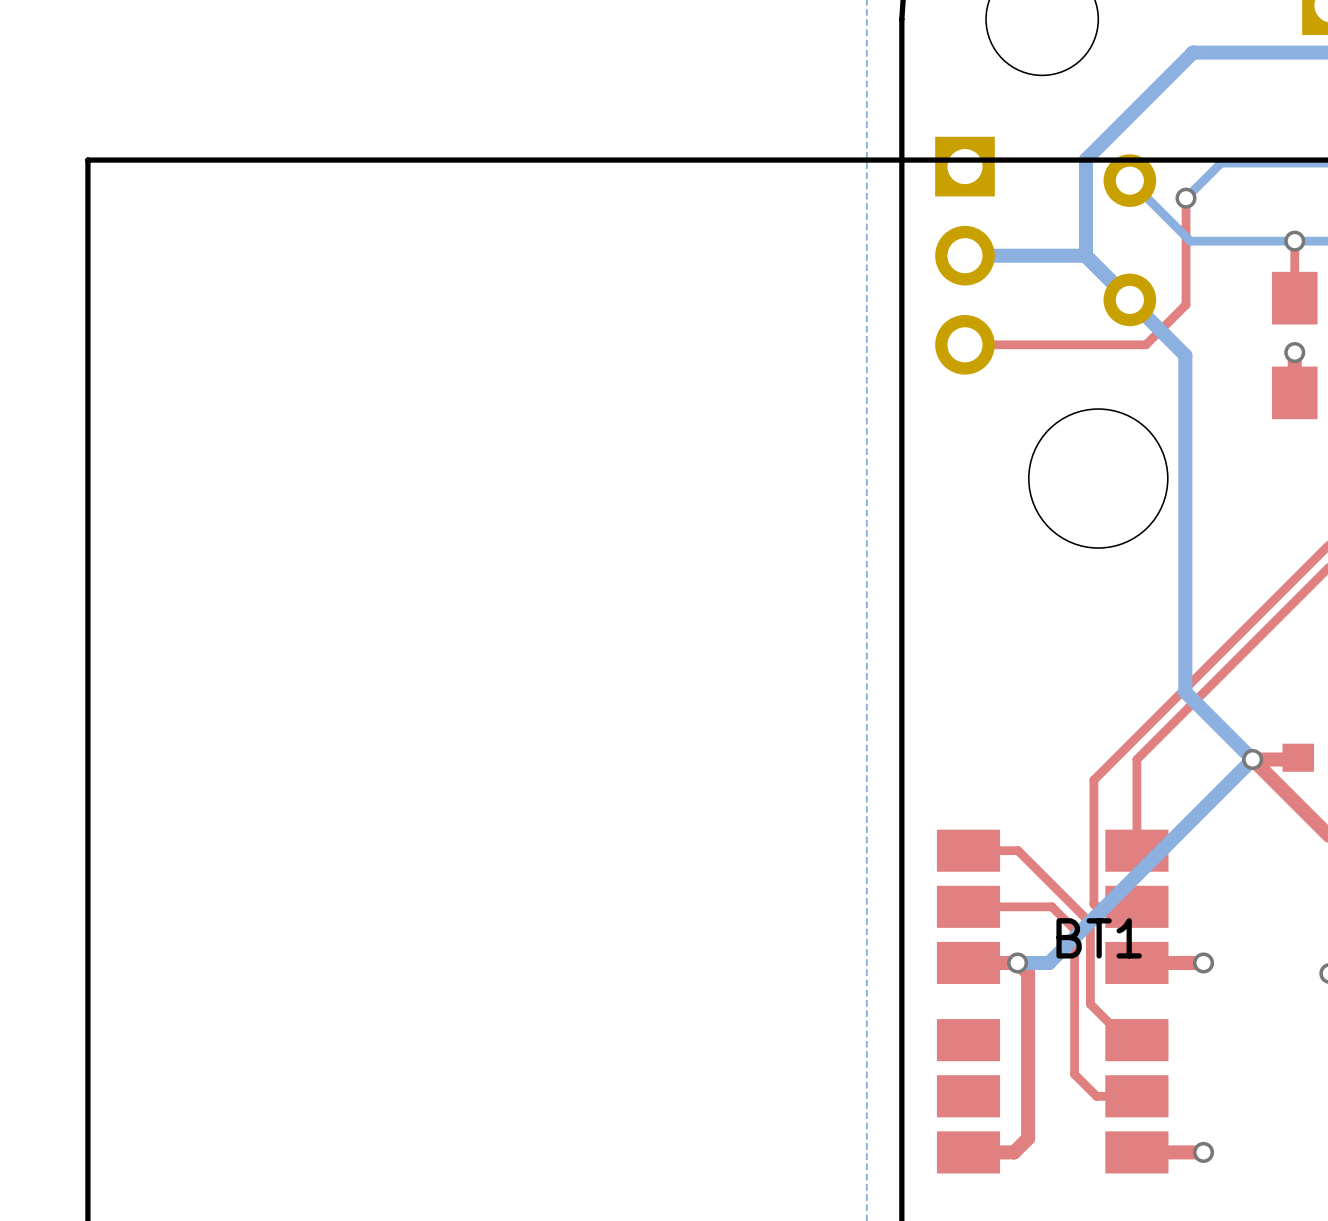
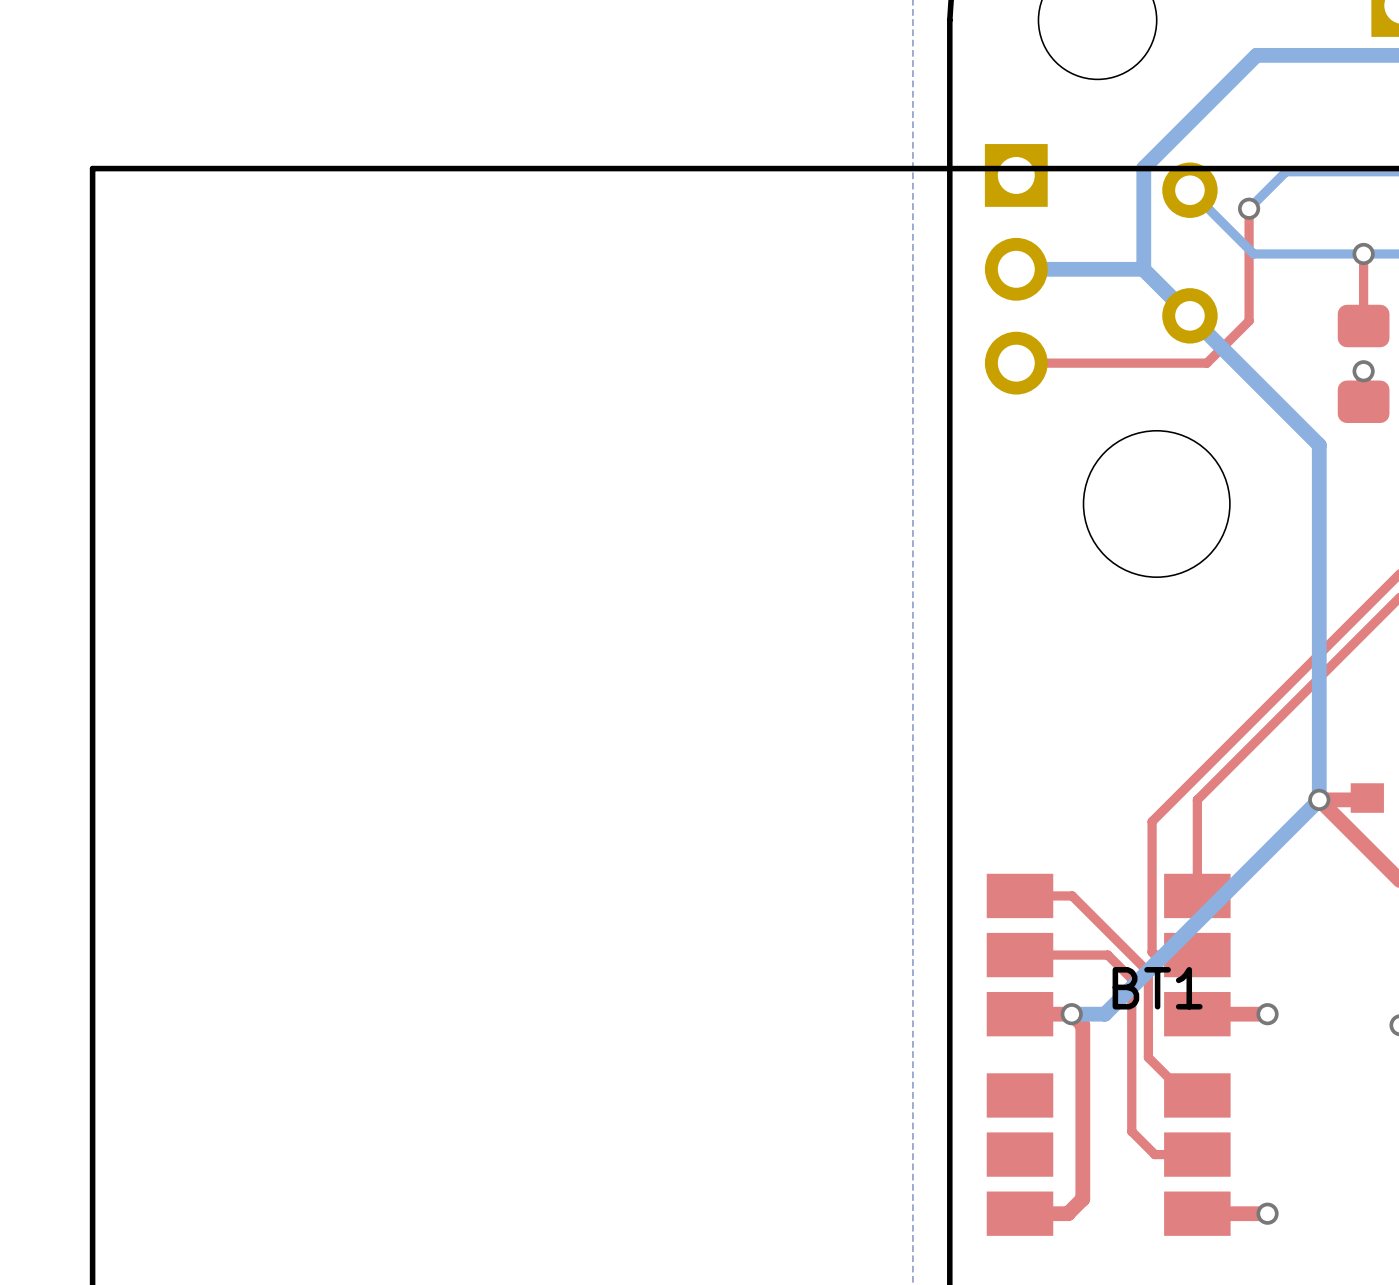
part footprint: [1271, 271, 1318, 420] -> [1337, 304, 1390, 424]
bottom track: (1185, 355) (1185, 692) (1252, 759) -> (1248, 374) (1319, 445) (1319, 799)

